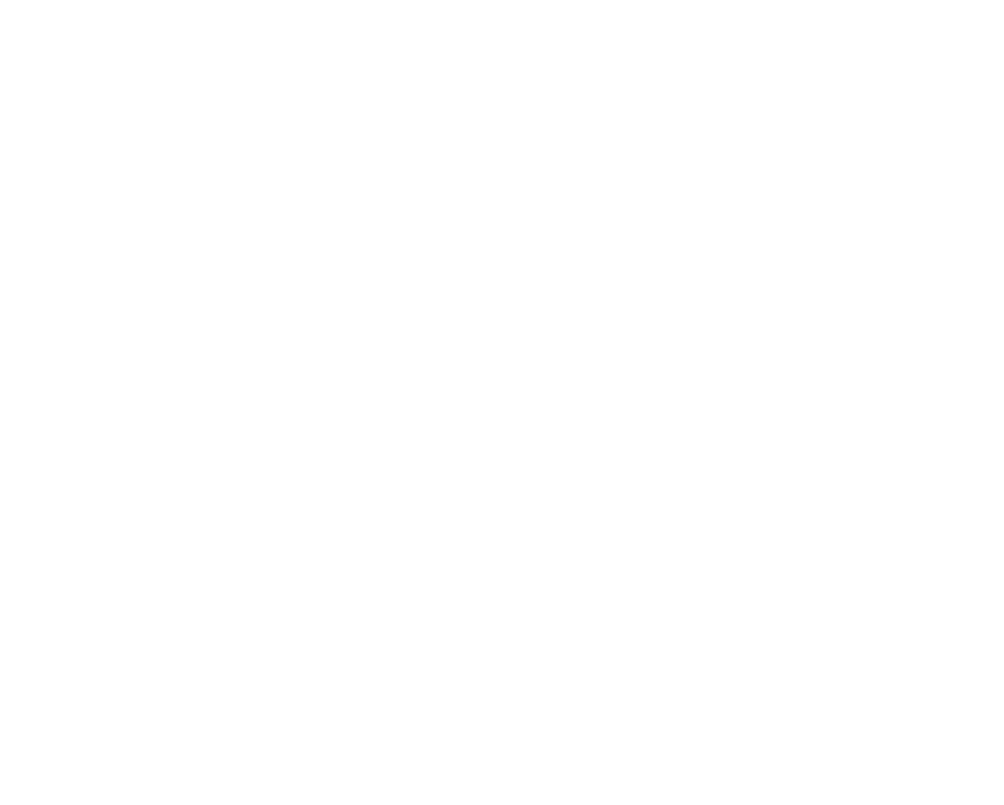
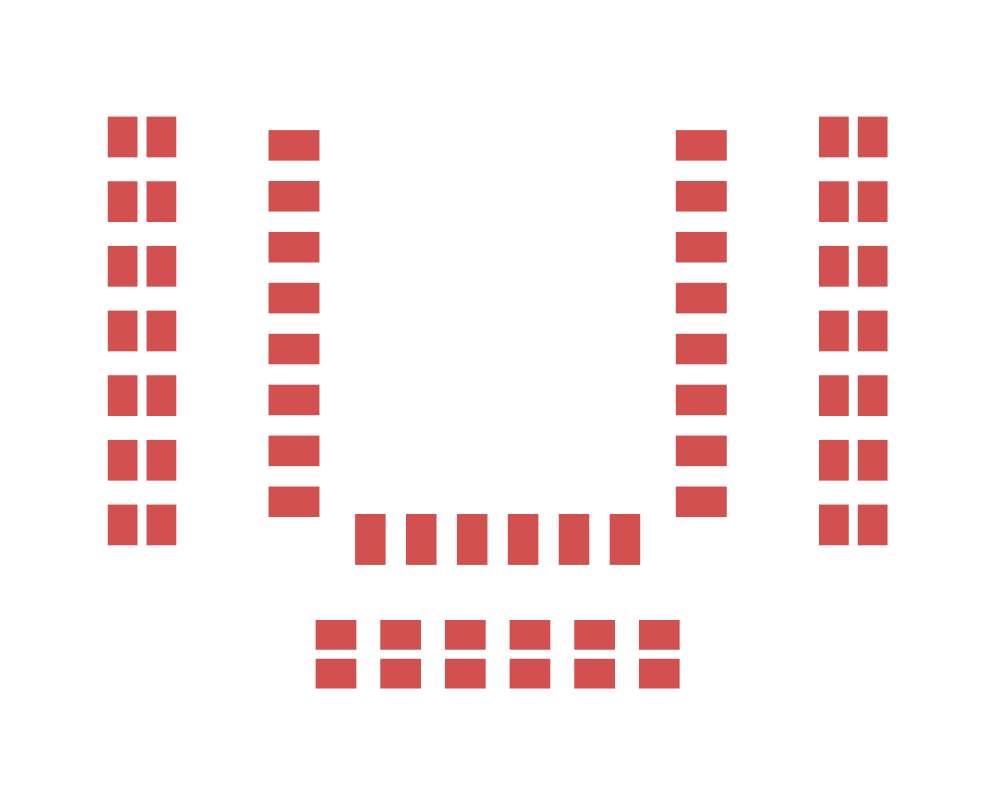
part: none -> (142, 136)
part: none -> (853, 136)
part: none -> (142, 201)
part: none -> (853, 201)
part: none -> (142, 266)
part: none -> (853, 266)
part: none -> (142, 330)
part: none -> (853, 330)
part: none -> (497, 347)
part: none -> (142, 395)
part: none -> (853, 395)
part: none -> (142, 460)
part: none -> (853, 460)
part: none -> (142, 524)
part: none -> (853, 524)
part: none -> (335, 654)
part: none -> (400, 654)
part: none -> (465, 654)
part: none -> (529, 654)
part: none -> (594, 654)
part: none -> (659, 654)

